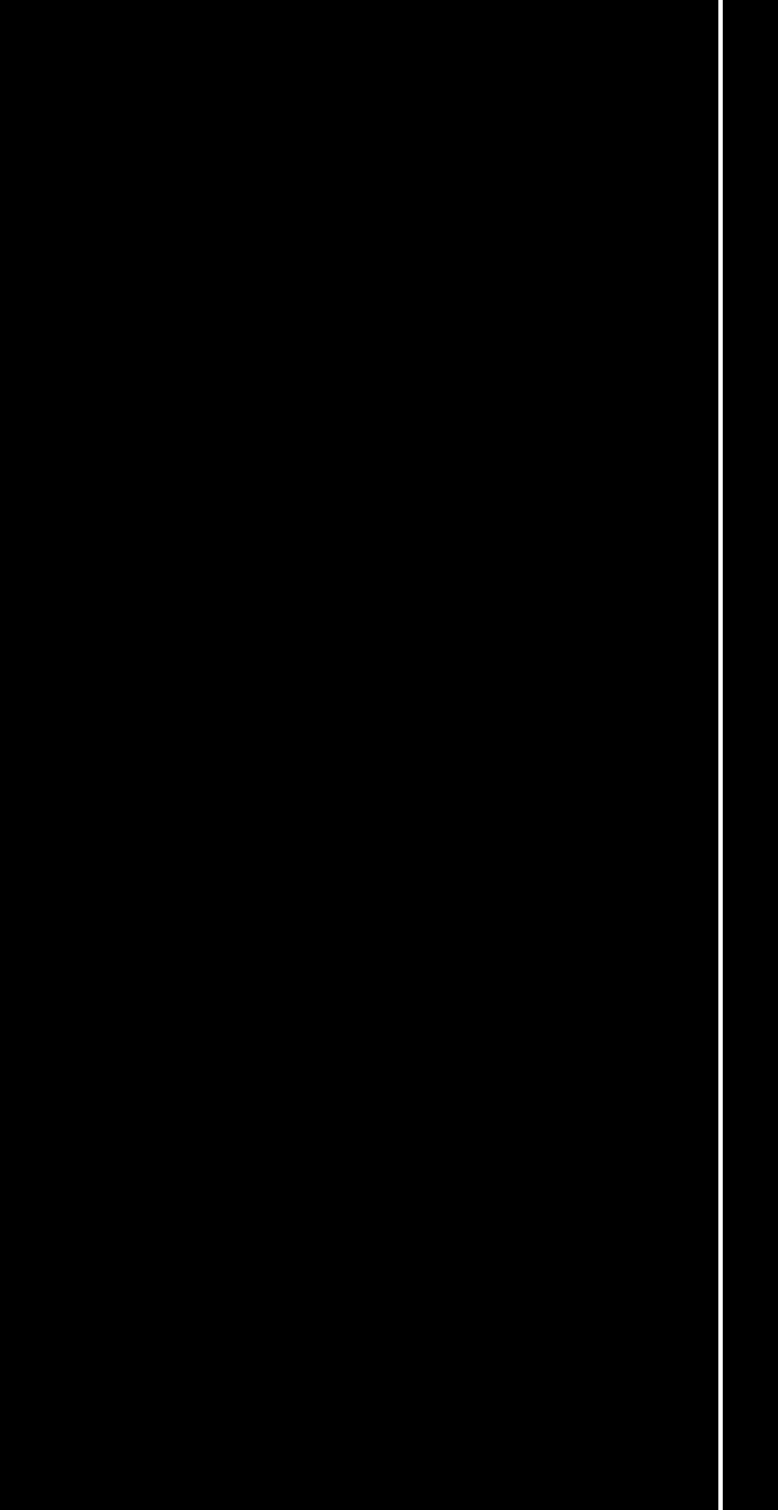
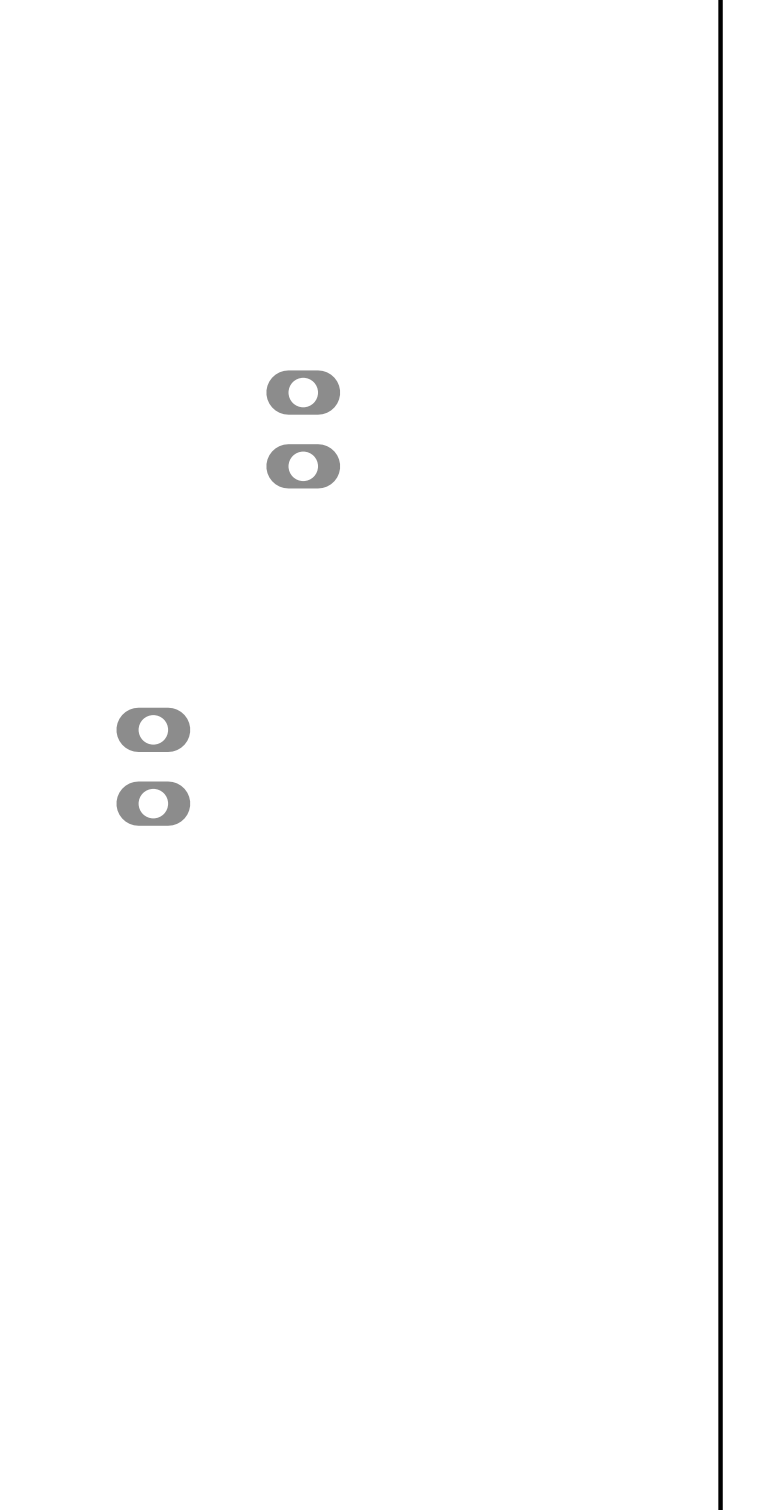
part: none -> (303, 429)
part: none -> (153, 766)

